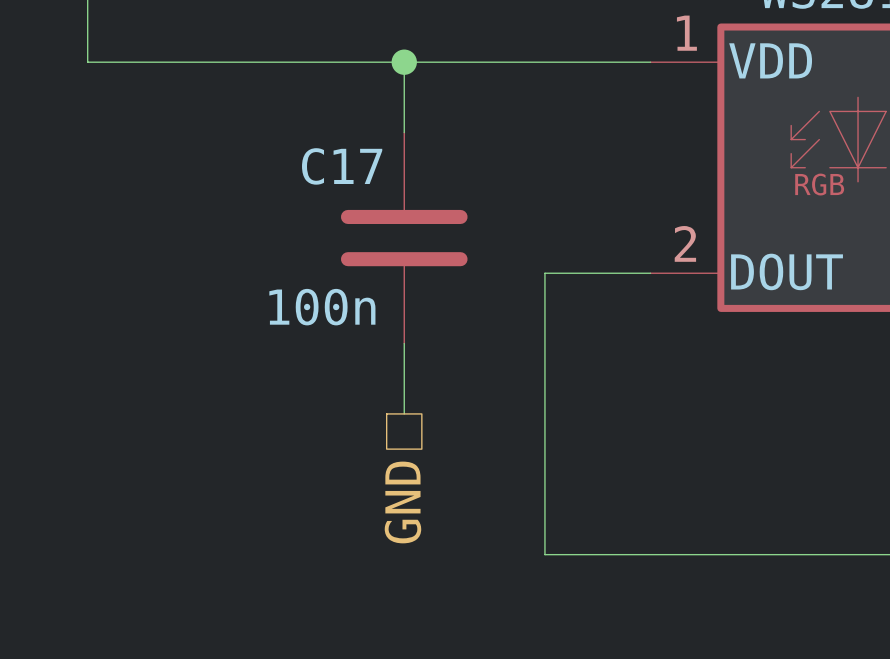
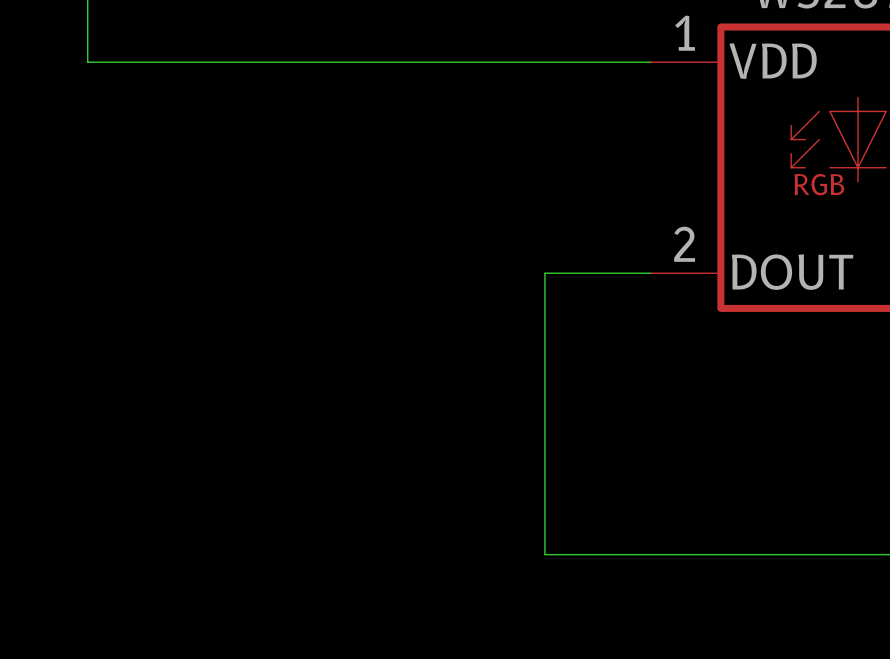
wire: (404, 62) (404, 132) -> none
junction: (404, 62) -> none
C17: 100n (404, 238) -> none
wire: (404, 343) (404, 413) -> none
hierarchical label: GND (402, 502) -> none

